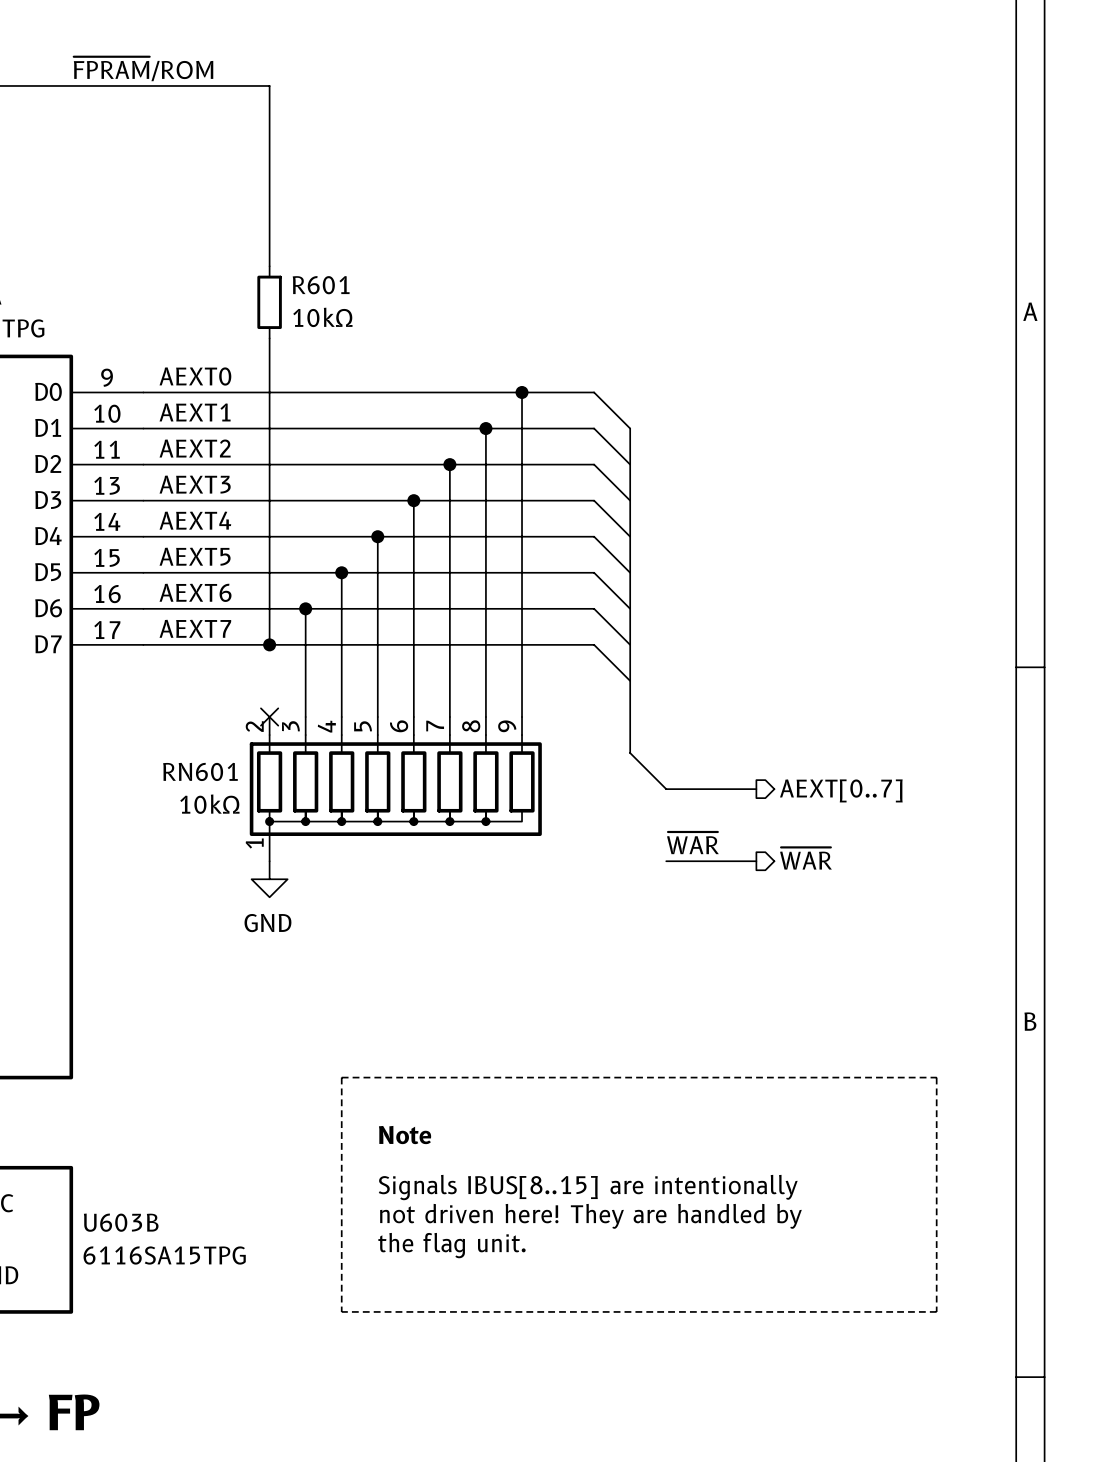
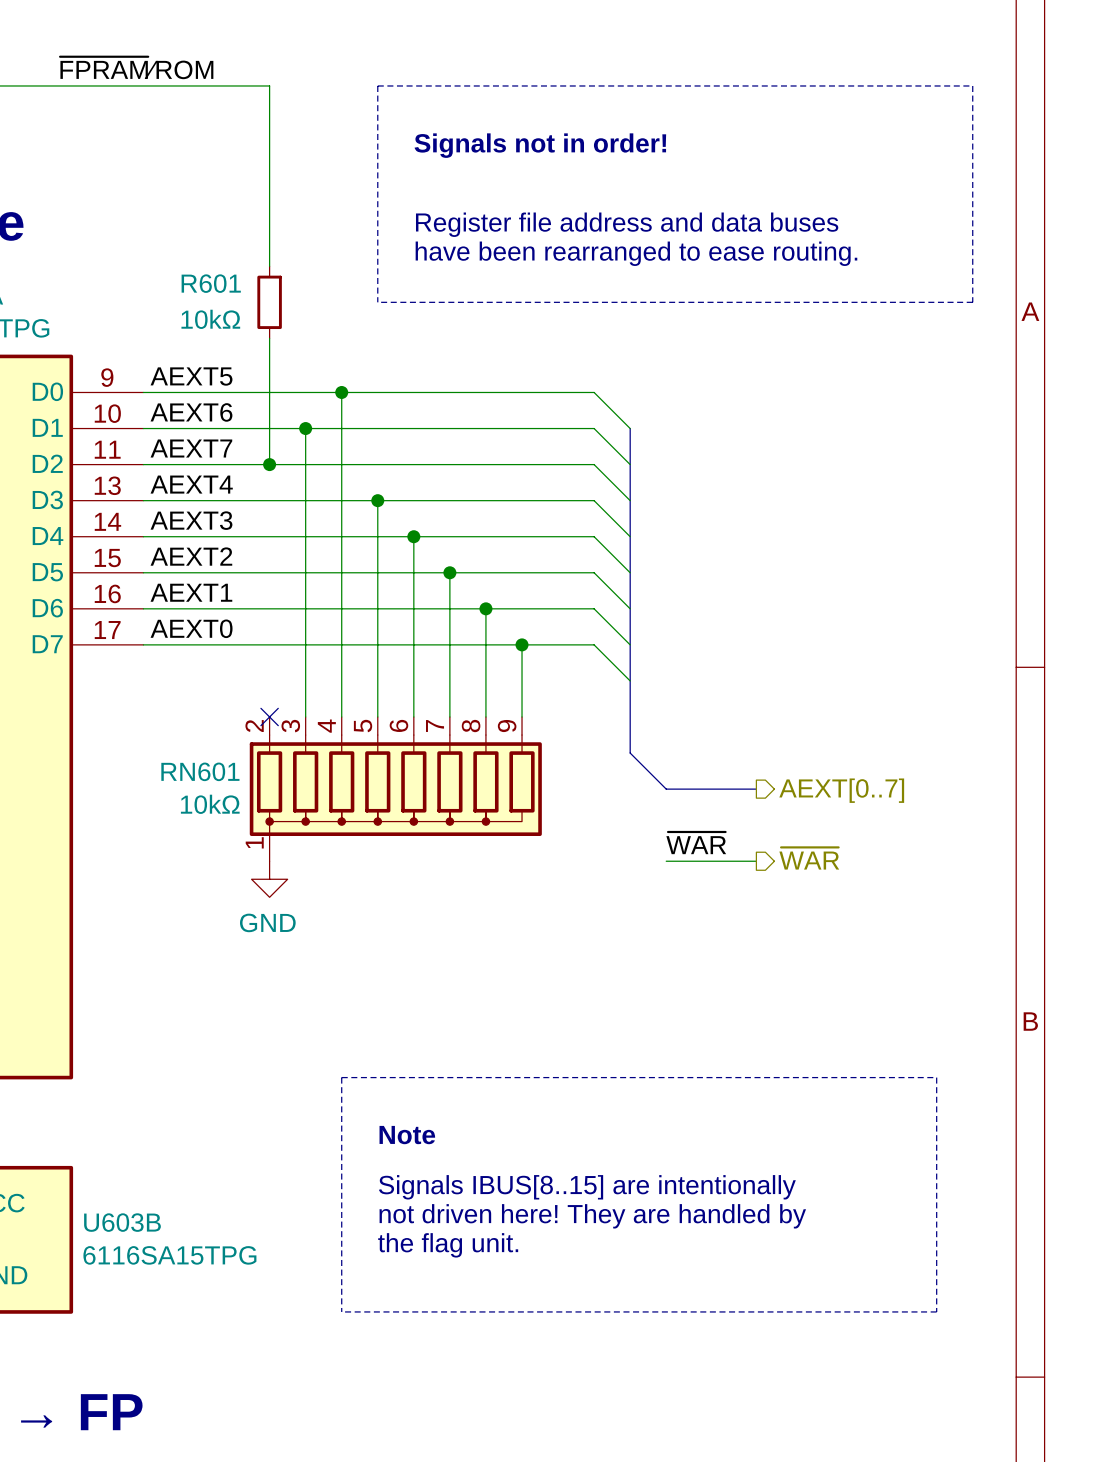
line: none -> (377, 85) (377, 302) (972, 302) (972, 85) (377, 85)
text: none -> Signals not in order! (540, 145)
text: none -> Register file address and data buses (627, 224)
text: none -> have been rearranged to ease routing. (636, 253)
R601 name position: R601 (321, 285) -> R601 (211, 283)
R601 value position: 10kΩ (322, 317) -> 10kΩ (210, 319)
label: AEXT0 (195, 376) -> AEXT5 (191, 376)
junction: none -> (341, 392)
wire: (522, 392) (522, 644) -> none
junction: (522, 392) -> none
label: AEXT1 (195, 412) -> AEXT6 (191, 412)
junction: none -> (305, 428)
wire: (485, 428) (485, 608) -> (341, 392) (341, 572)
junction: (485, 428) -> none
label: AEXT2 (195, 448) -> AEXT7 (191, 448)
wire: (269, 464) (269, 644) -> (305, 428) (305, 608)
junction: none -> (269, 464)
wire: (449, 464) (449, 572) -> none
junction: (449, 464) -> none
label: AEXT3 (195, 484) -> AEXT4 (191, 484)
junction: none -> (377, 500)
wire: (413, 500) (413, 536) -> (377, 500) (377, 536)
junction: (413, 500) -> none
label: AEXT4 (195, 520) -> AEXT3 (191, 520)
junction: (377, 536) -> none
junction: none -> (413, 536)
label: AEXT5 (195, 556) -> AEXT2 (191, 556)
junction: (341, 572) -> none
junction: none -> (449, 572)
label: AEXT6 (195, 592) -> AEXT1 (191, 592)
junction: (305, 608) -> none
junction: none -> (485, 608)
label: AEXT7 (195, 628) -> AEXT0 (191, 628)
junction: (269, 644) -> none
junction: none -> (522, 644)

